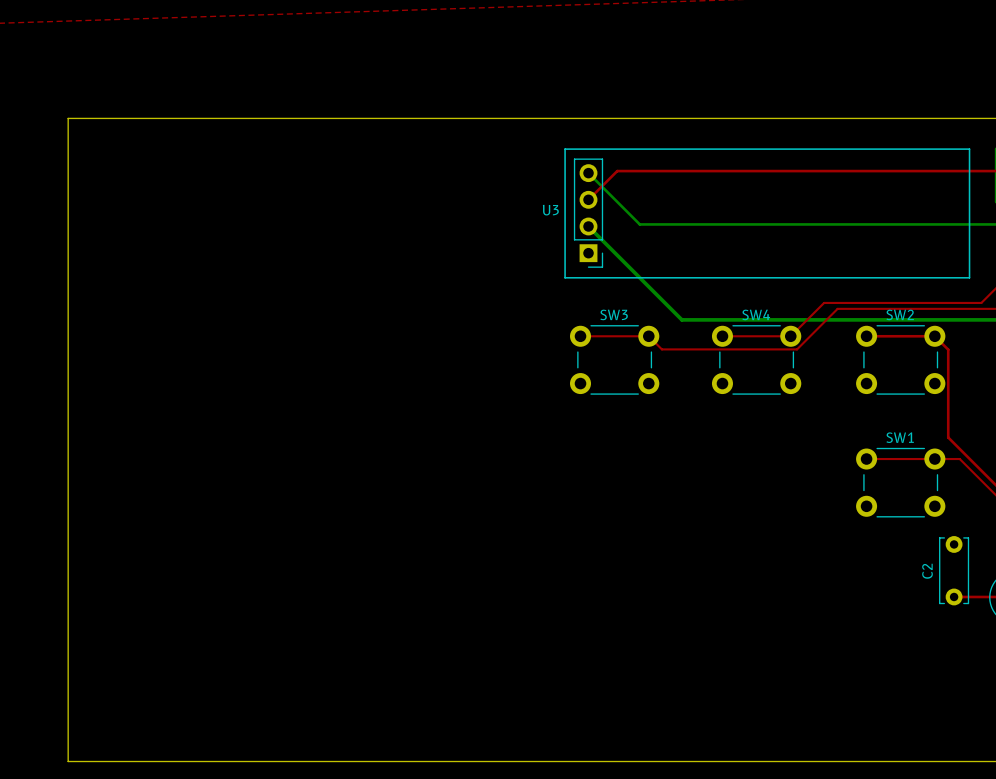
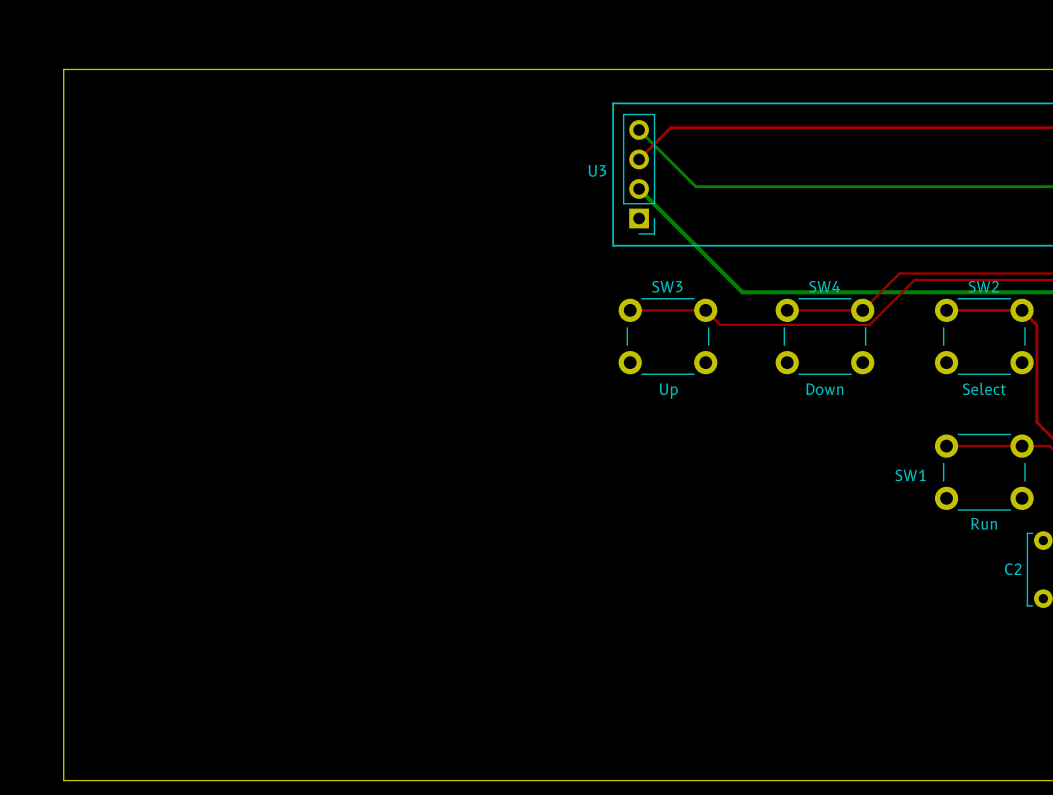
text: none -> Down (824, 389)
text: none -> Select (984, 388)
text: none -> Up (668, 391)
SW1 name position: SW1 (900, 437) -> SW1 (910, 475)
text: none -> Run (984, 523)
C2 name rotation: 0° (927, 571) -> 90° clockwise (1013, 569)

